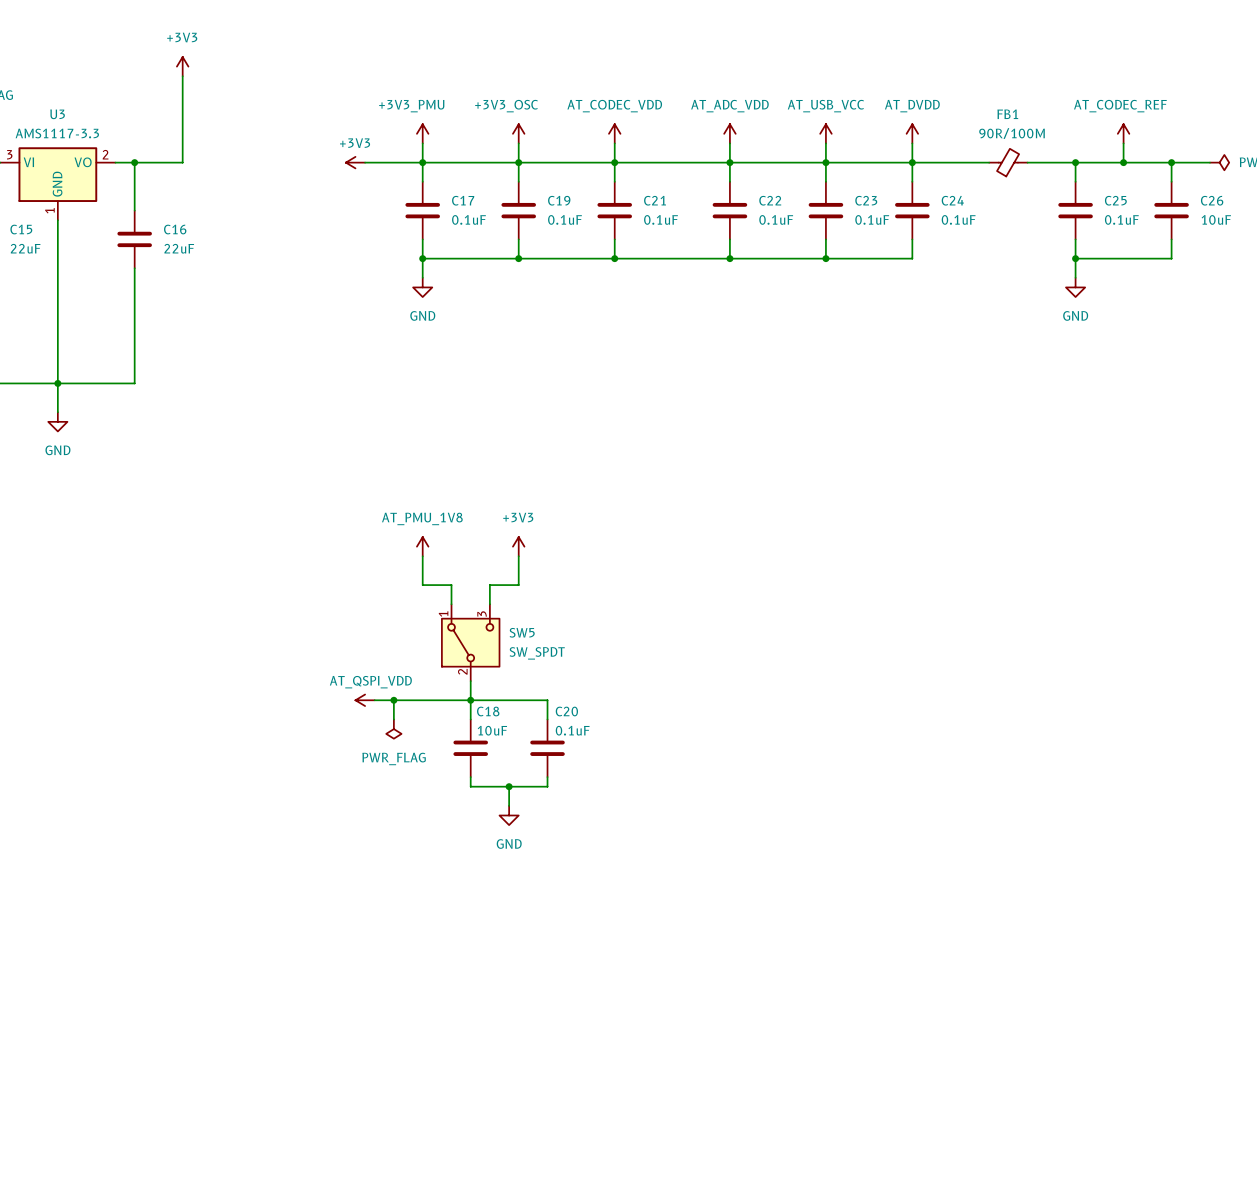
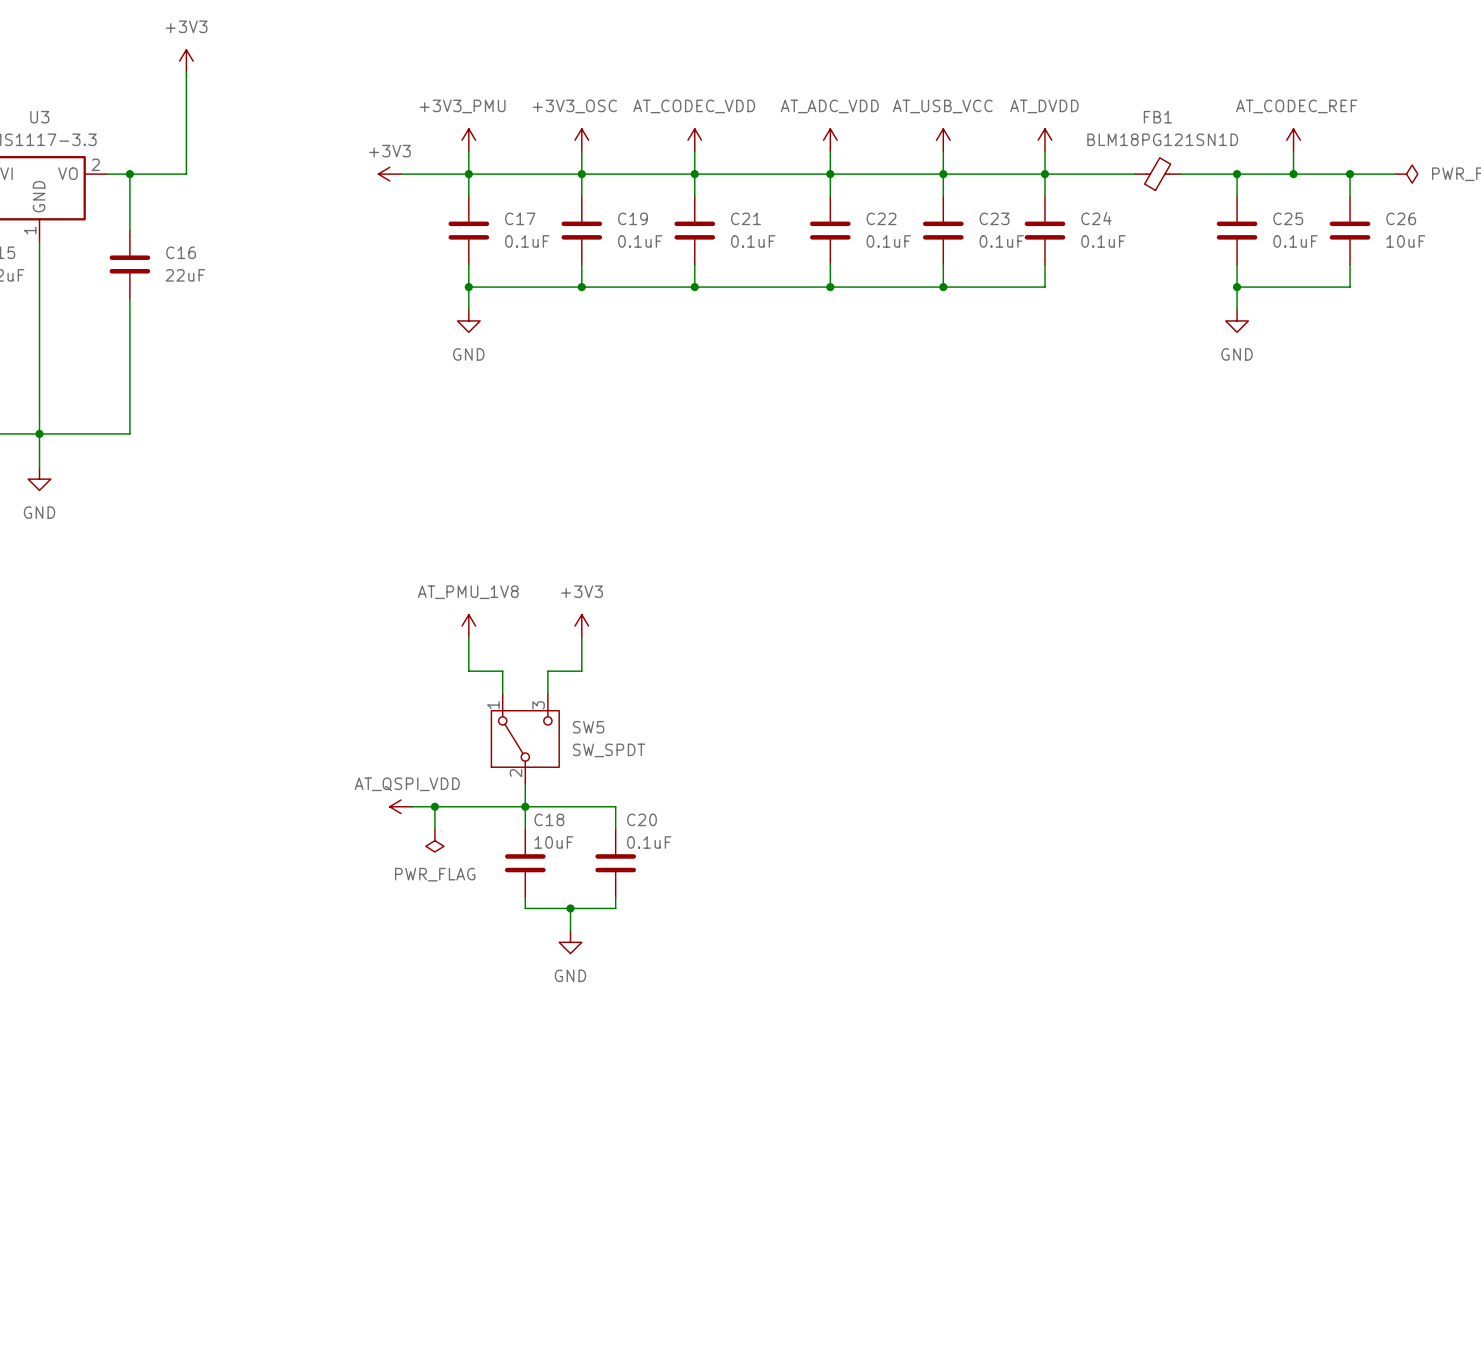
FB1 value: 90R/100M (1012, 133) -> BLM18PG121SN1D (1162, 139)

